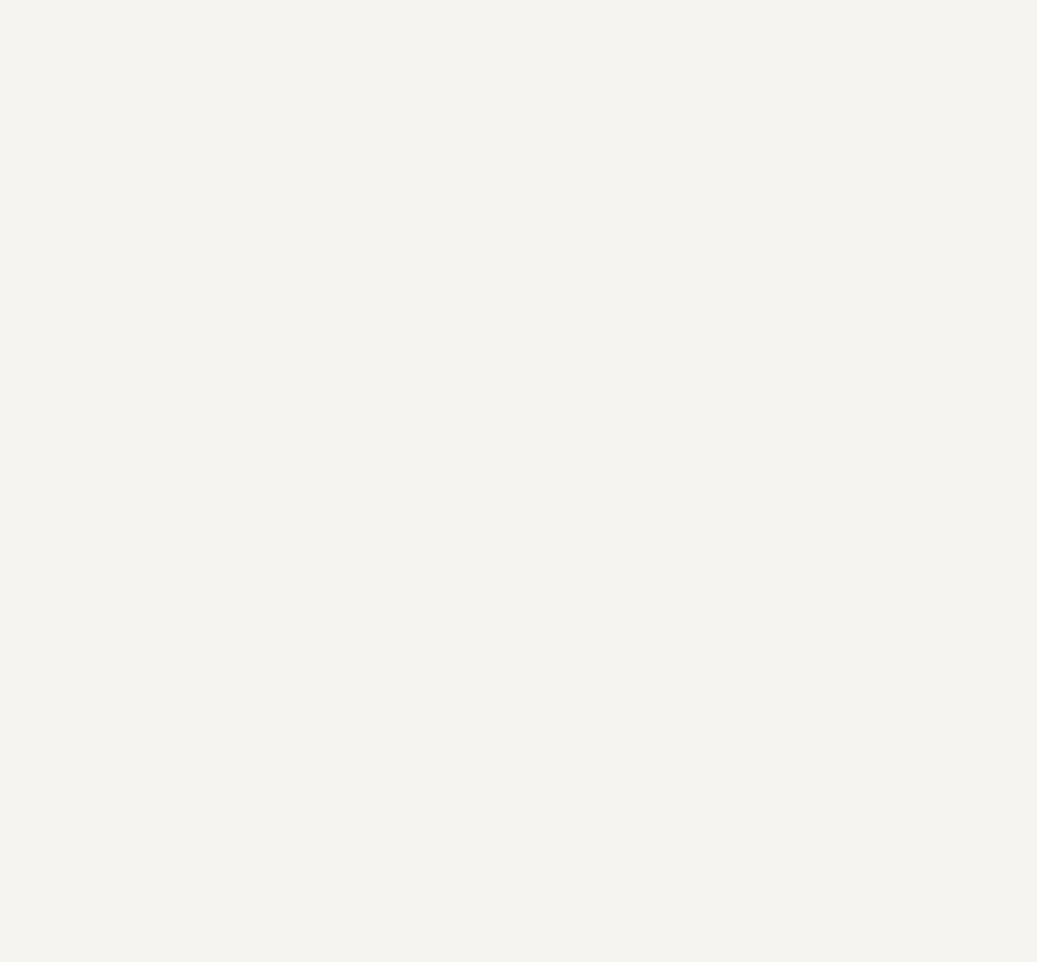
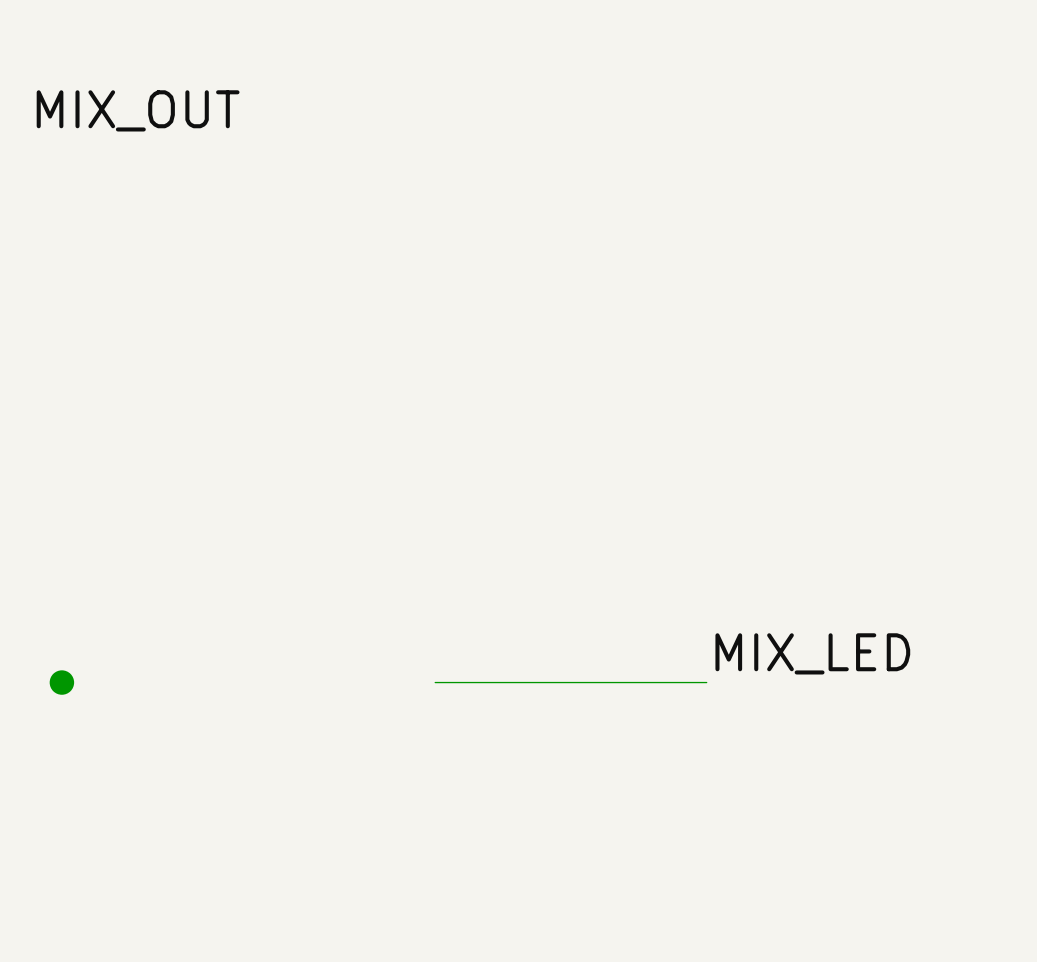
label: none -> MIX_OUT (138, 110)
label: none -> MIX_LED (812, 653)
junction: none -> (61, 682)
wire: none -> (435, 682) (706, 682)

